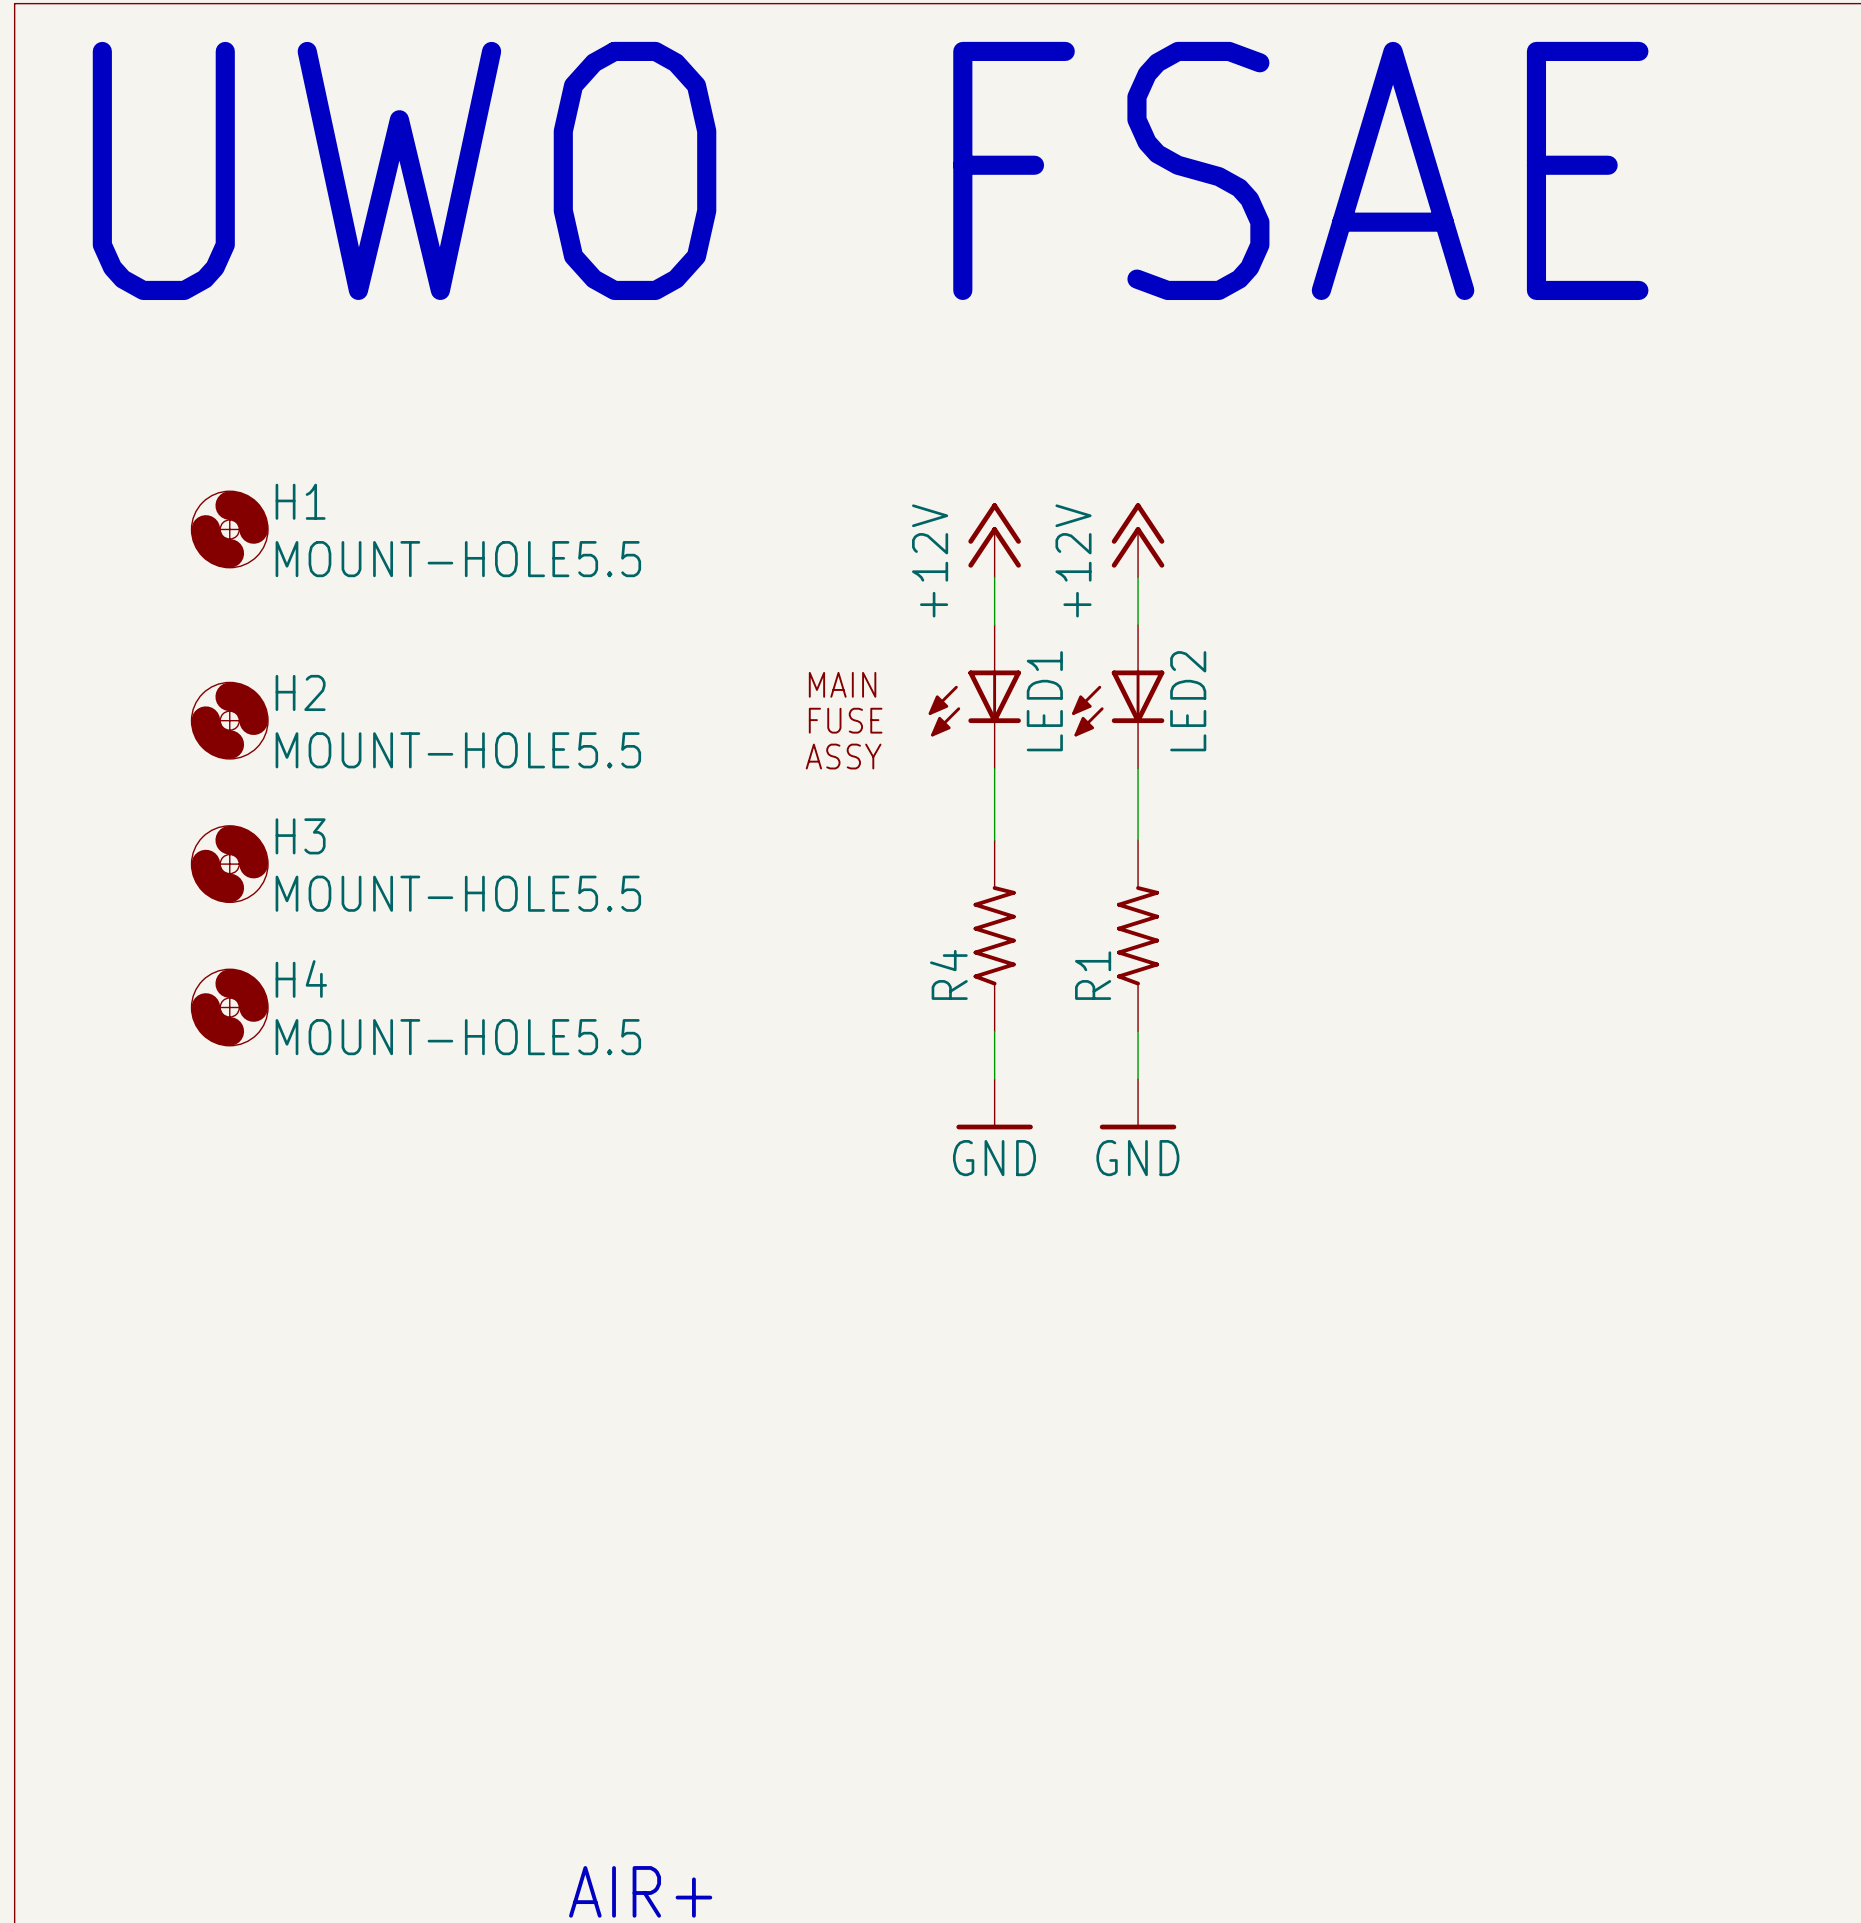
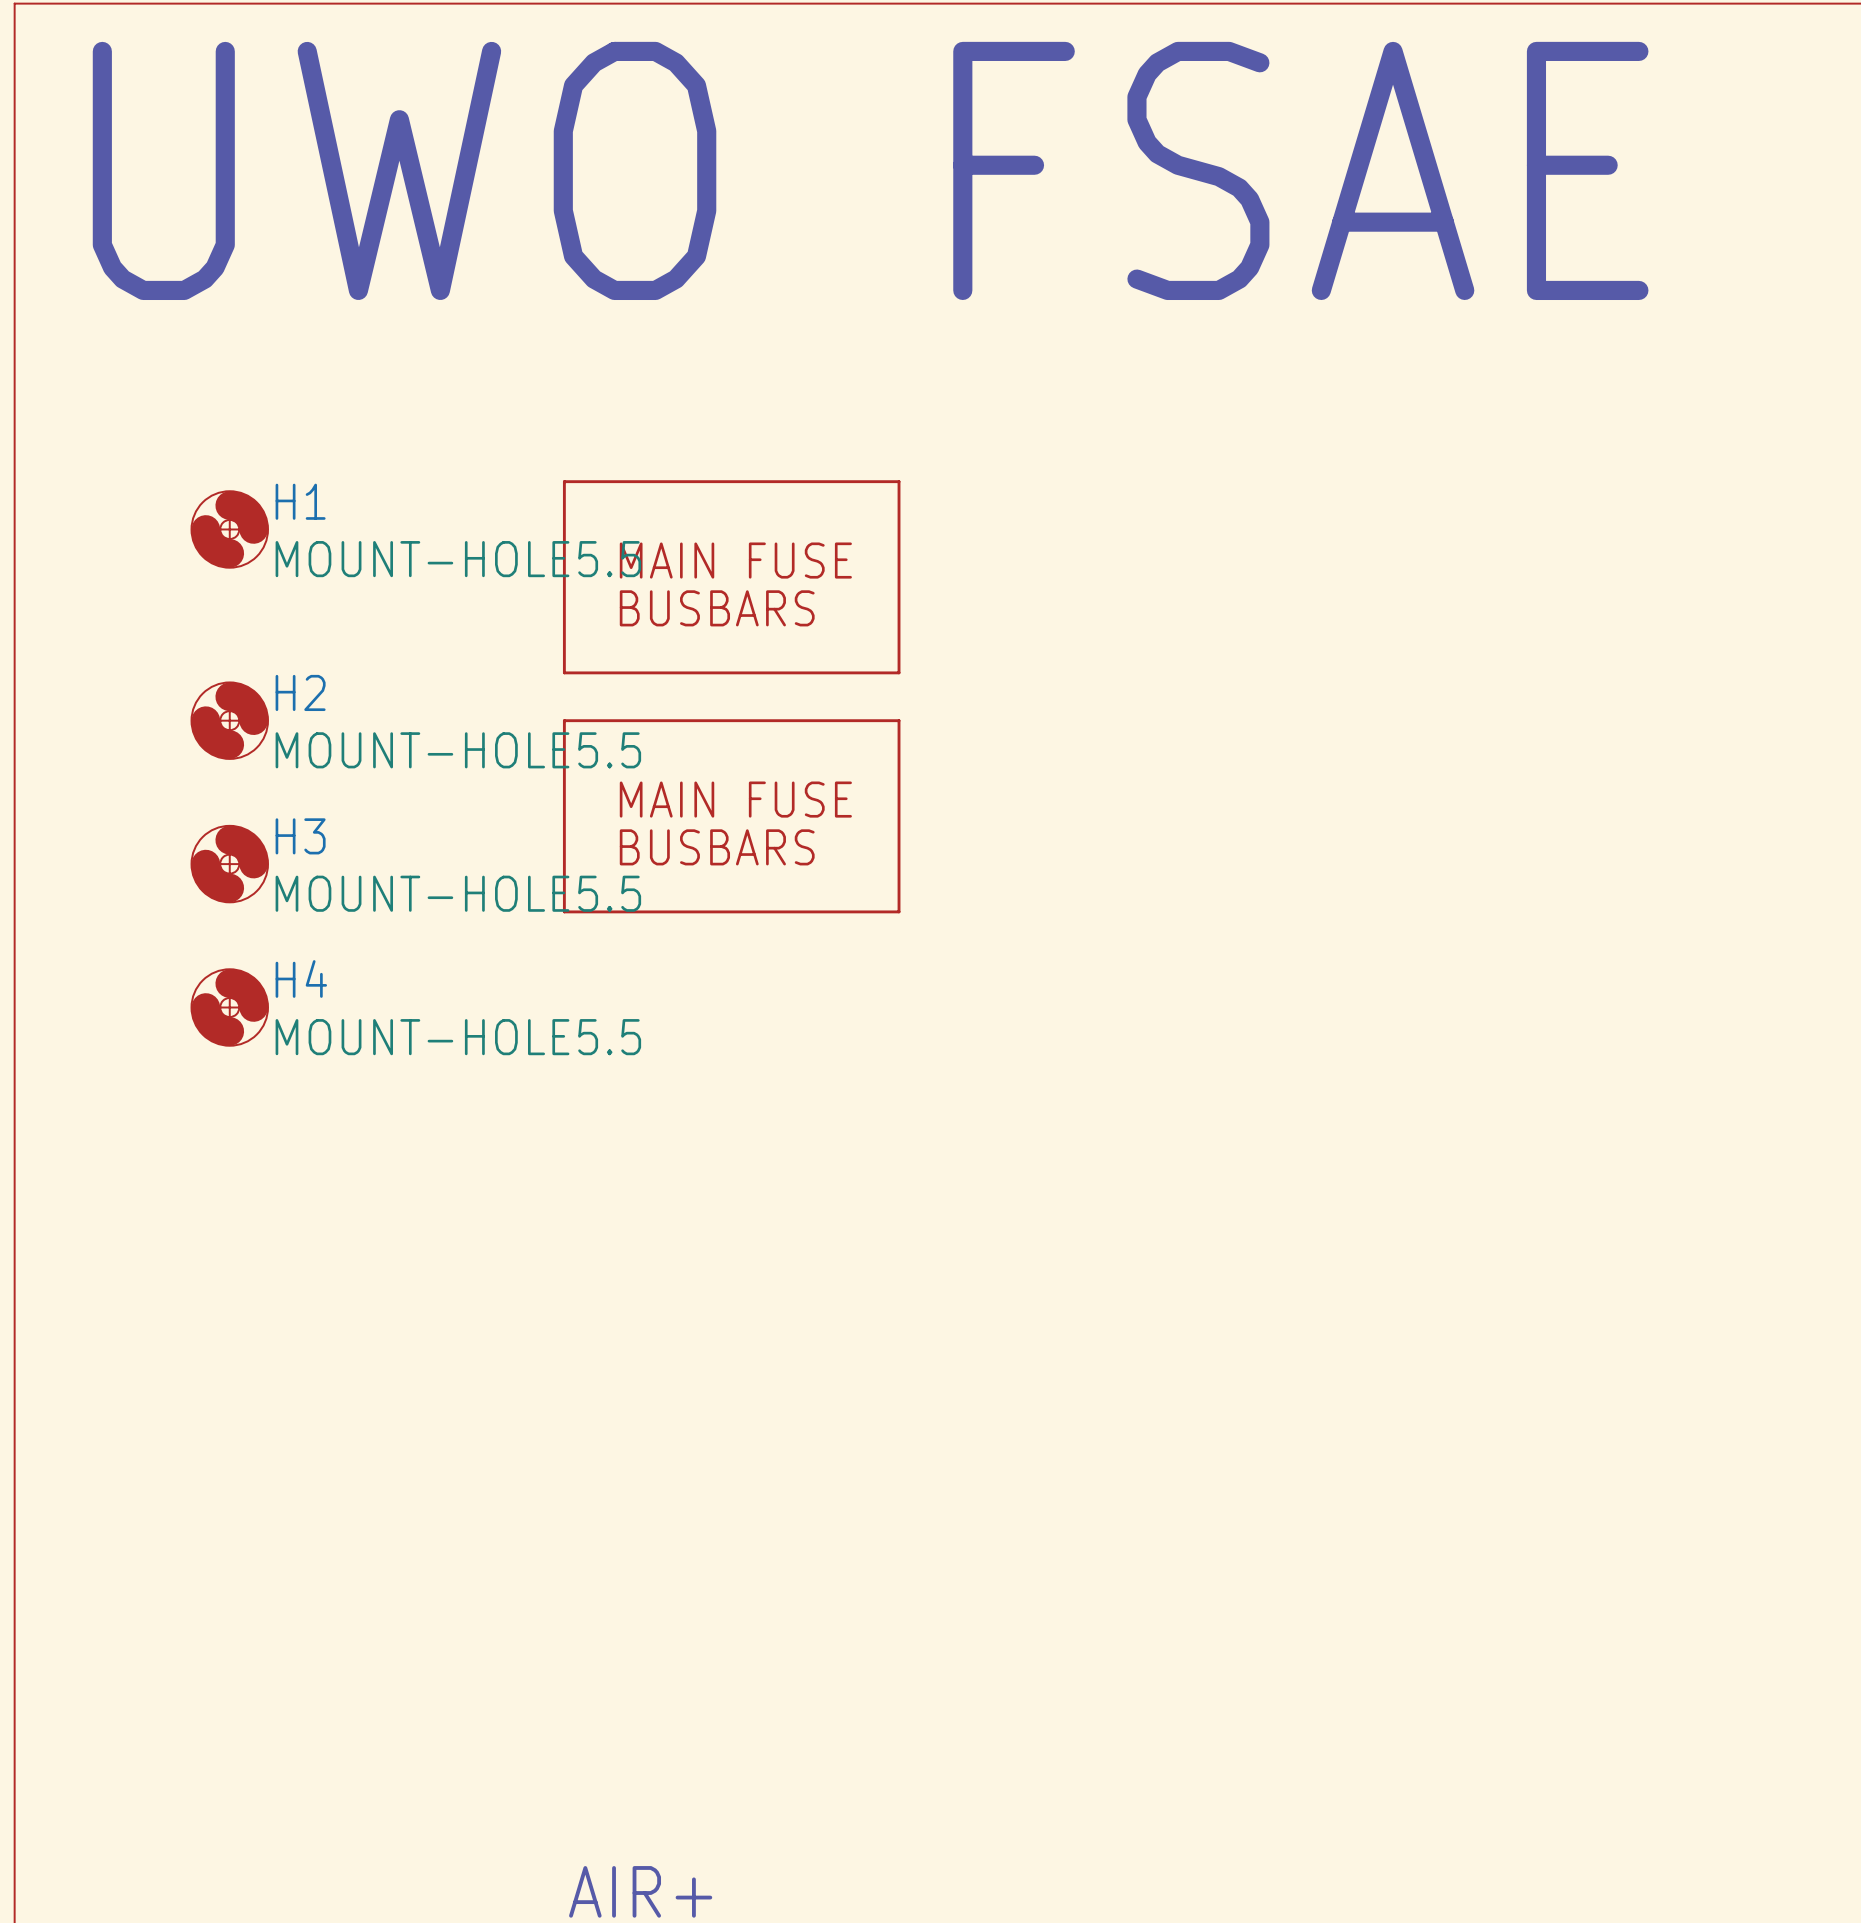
power symbol: +12V (994, 540) -> none
power symbol: +12V (1138, 540) -> none
part: none -> (731, 577)
wire: (994, 577) (994, 625) -> none
wire: (1138, 577) (1138, 625) -> none
LED1: (974, 696) -> none
LED2: (1118, 696) -> none
part: (844, 720) -> none
wire: (994, 768) (994, 840) -> none
wire: (1138, 768) (1138, 840) -> none
part: none -> (731, 816)
R4: (994, 935) -> none
R1: (1138, 935) -> none
wire: (994, 1031) (994, 1079) -> none
wire: (1138, 1031) (1138, 1079) -> none
power symbol: GND (994, 1104) -> none
power symbol: GND (1138, 1104) -> none

